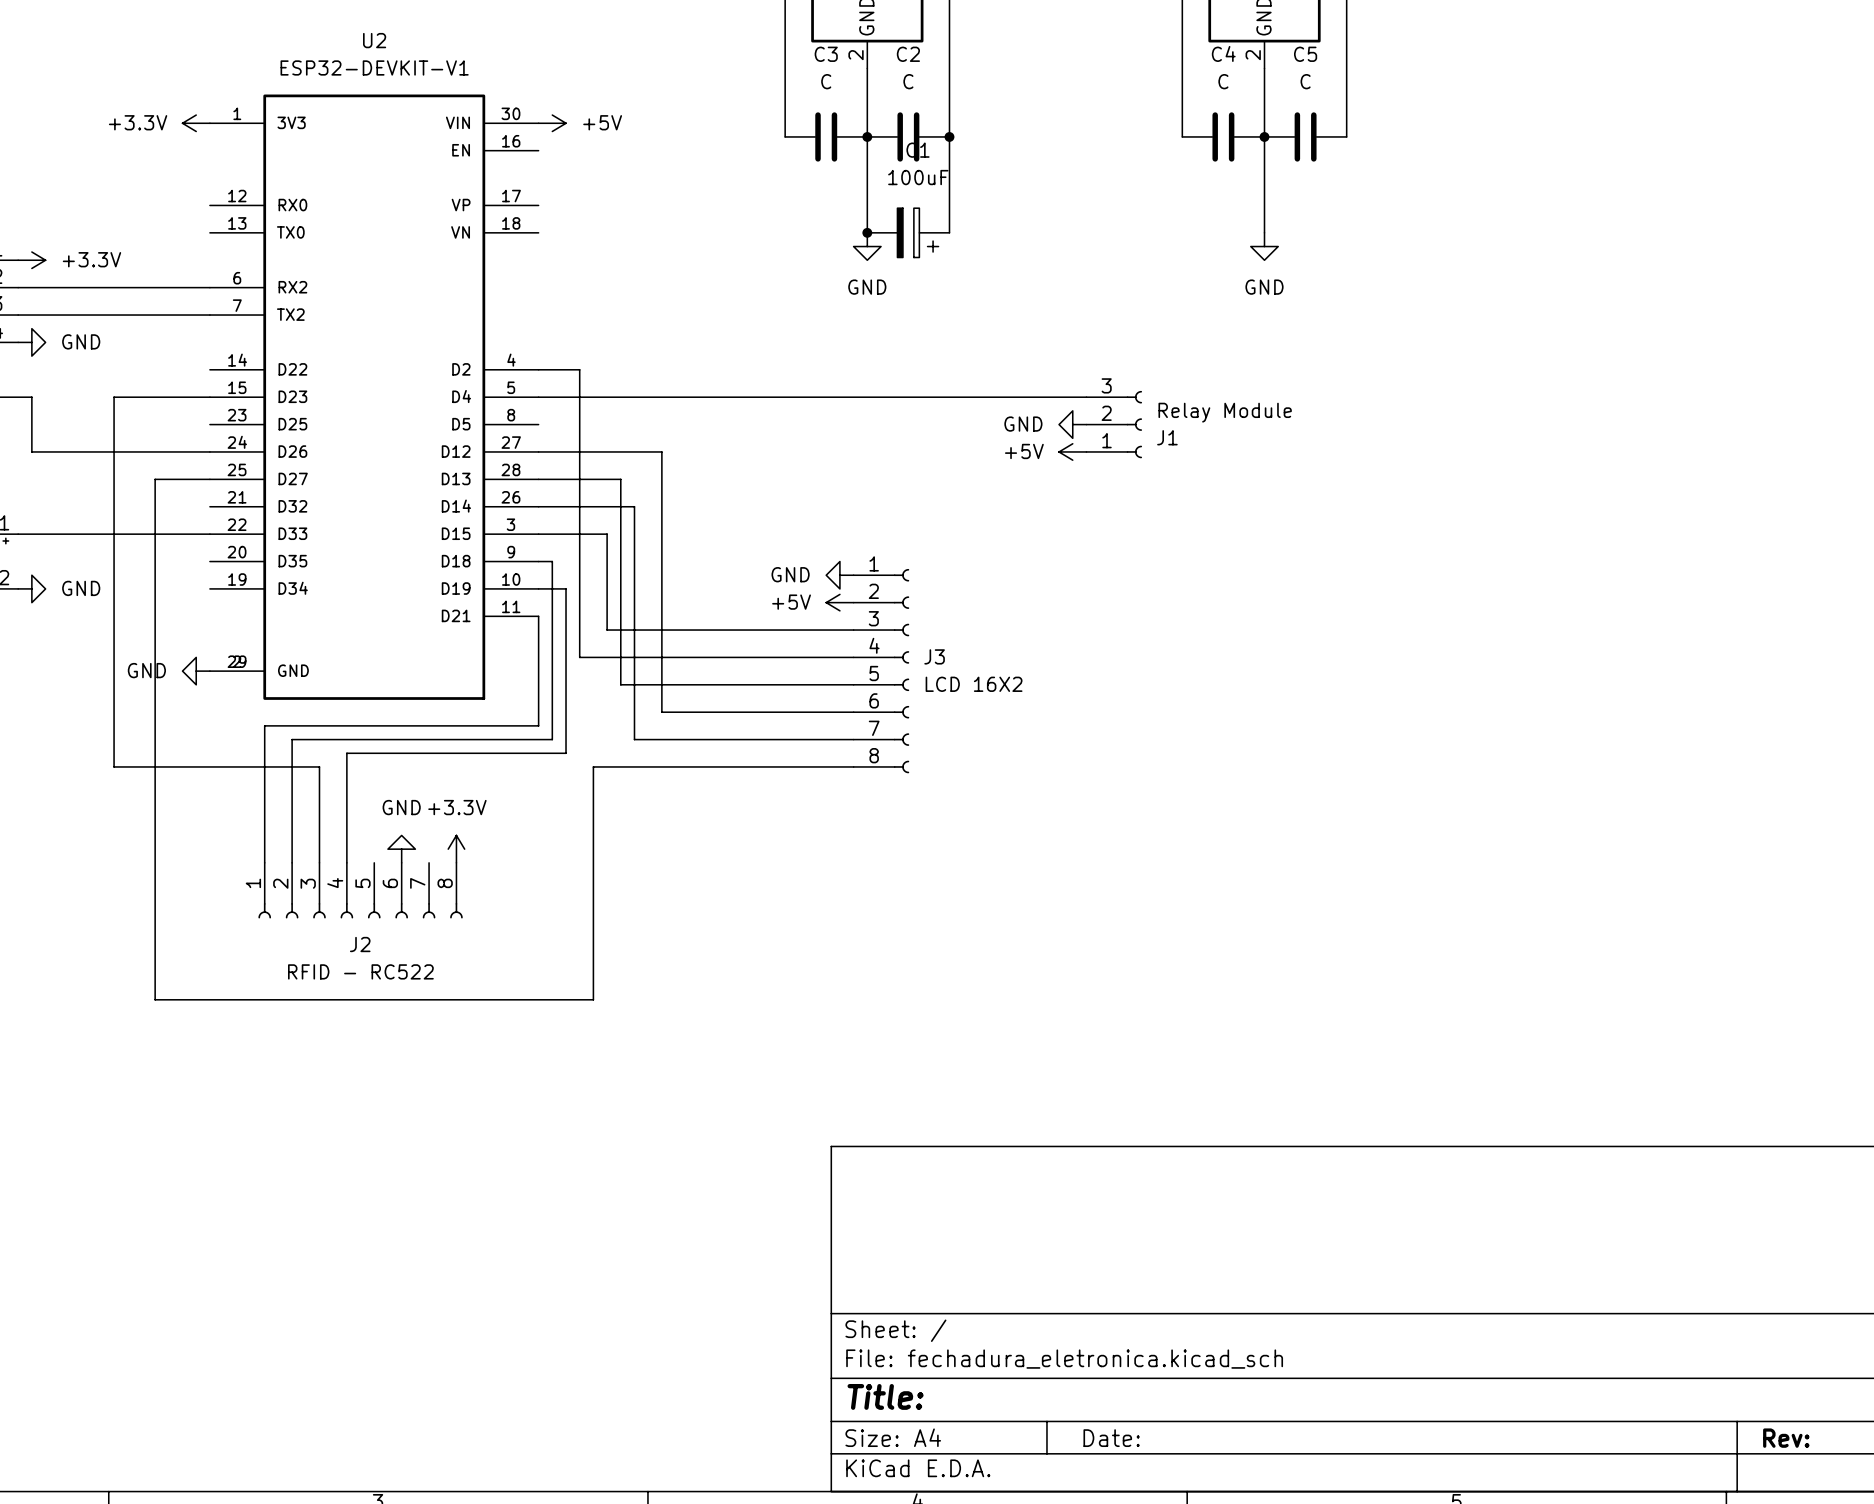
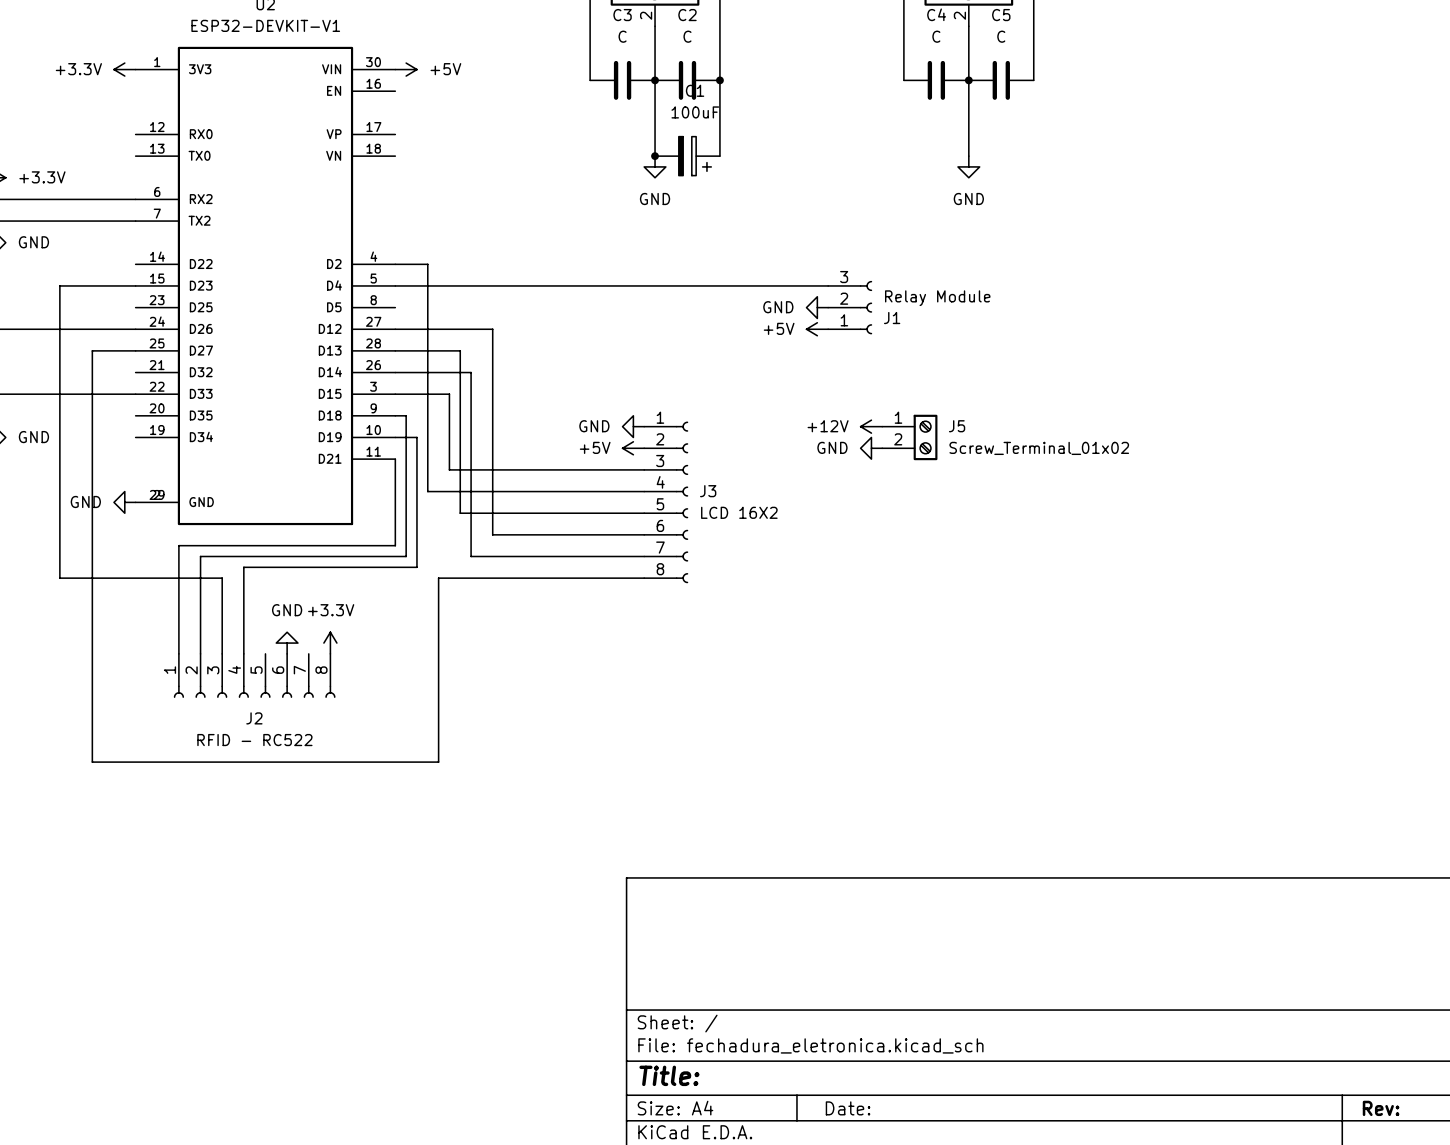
power symbol: none -> +12V (871, 426)
J5: none -> Screw_Terminal_01x02 (909, 437)
power symbol: none -> GND (871, 448)

